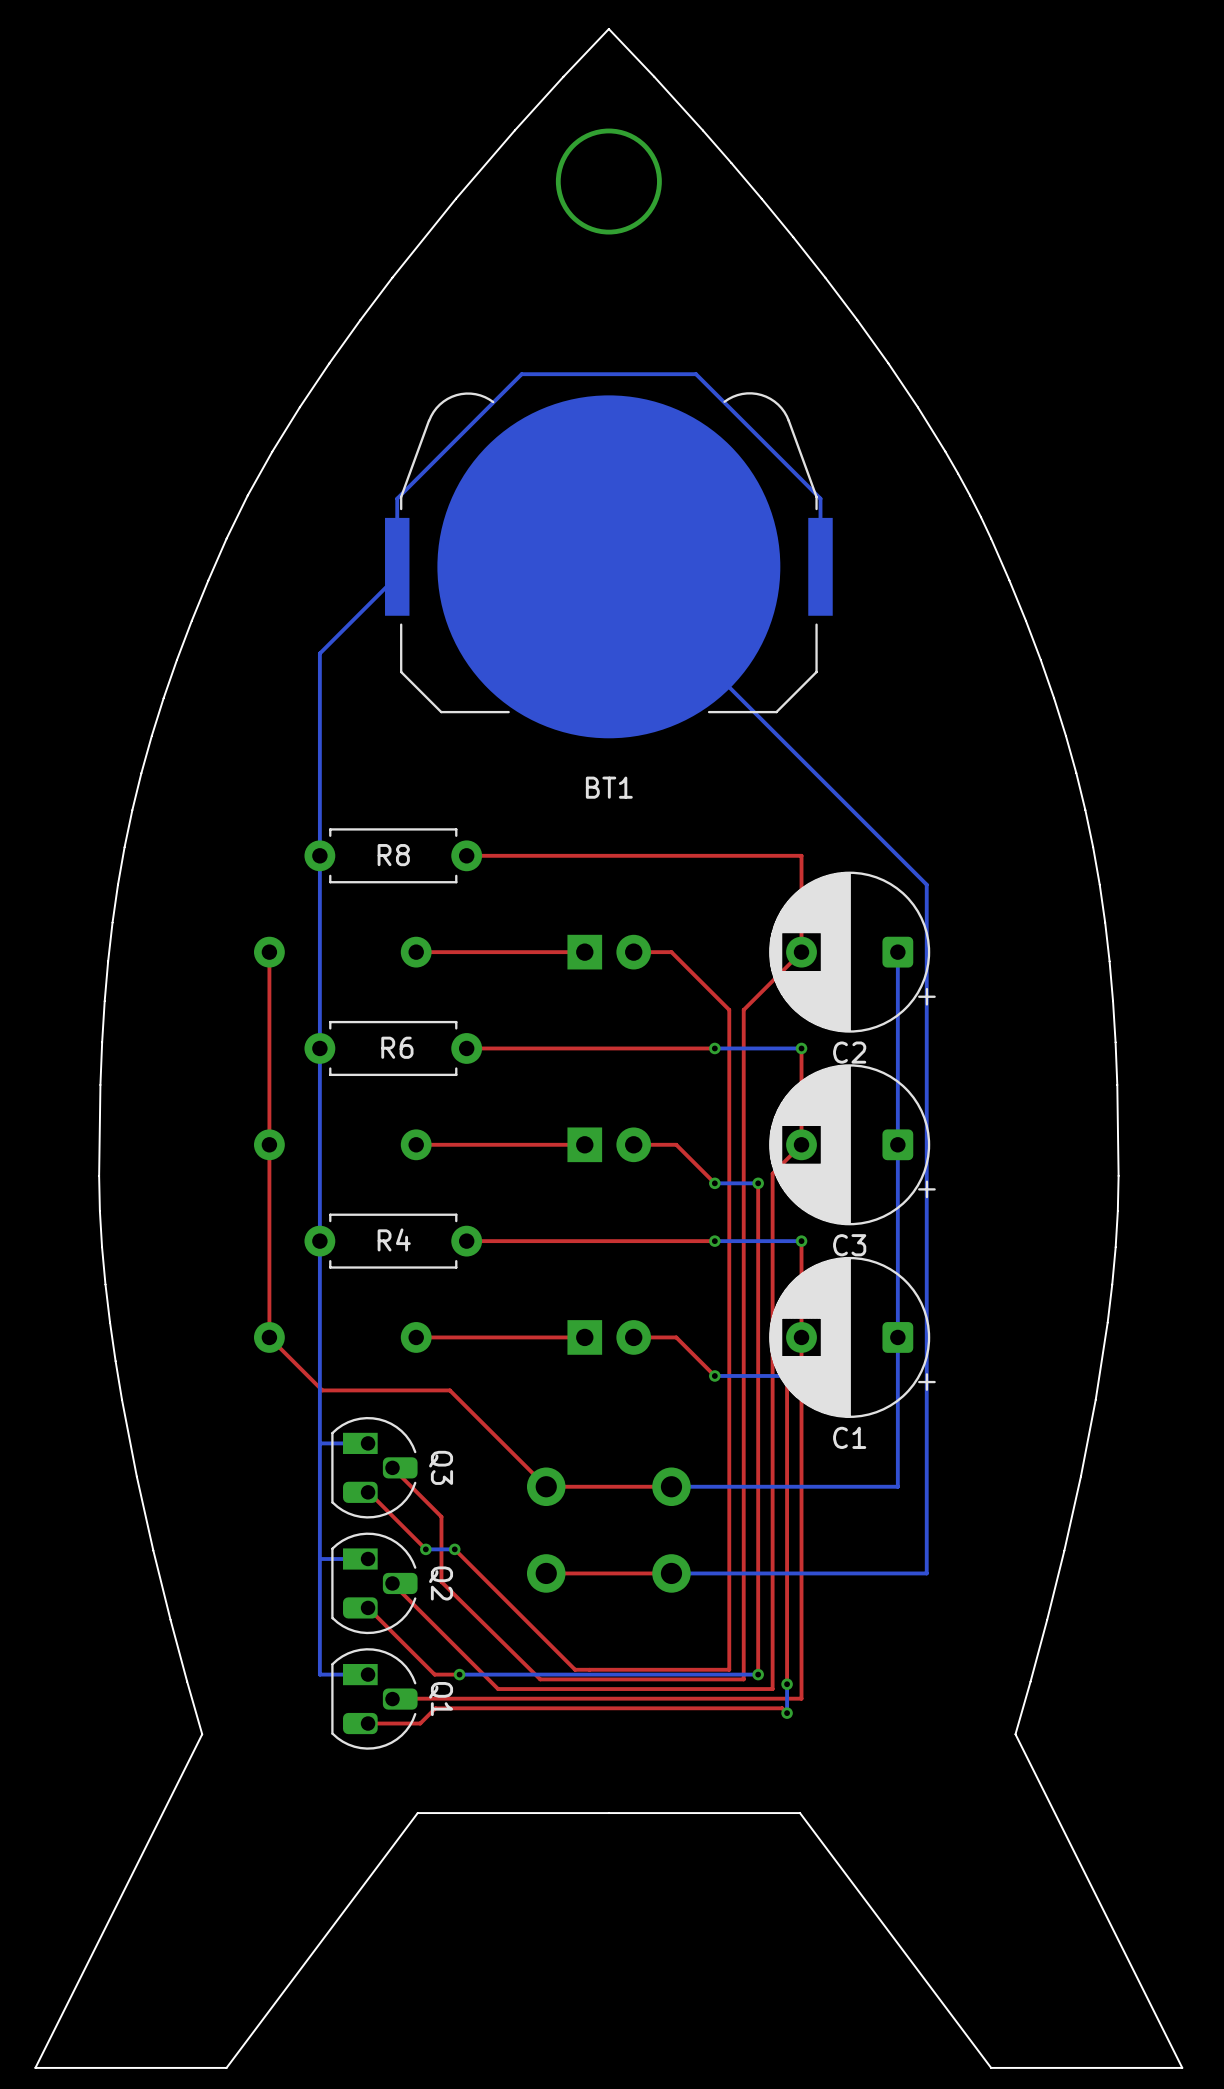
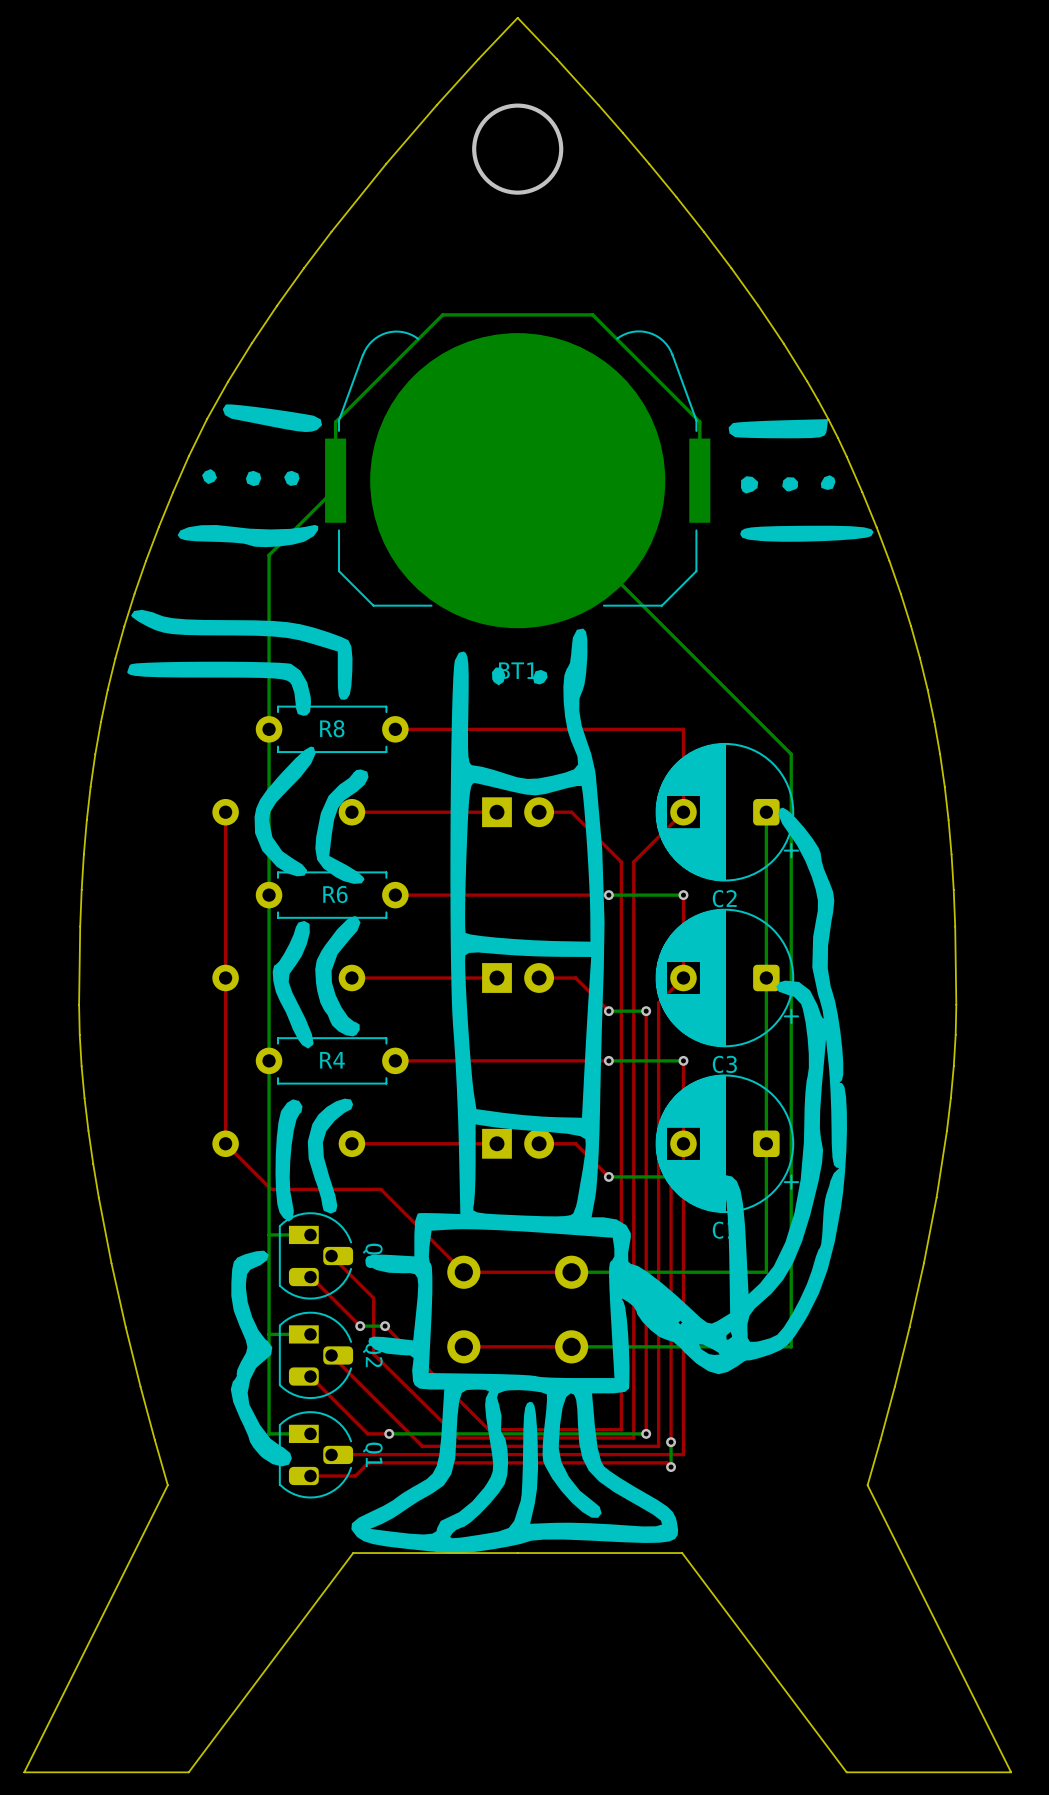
drawing: none -> [127, 404, 874, 1554]

